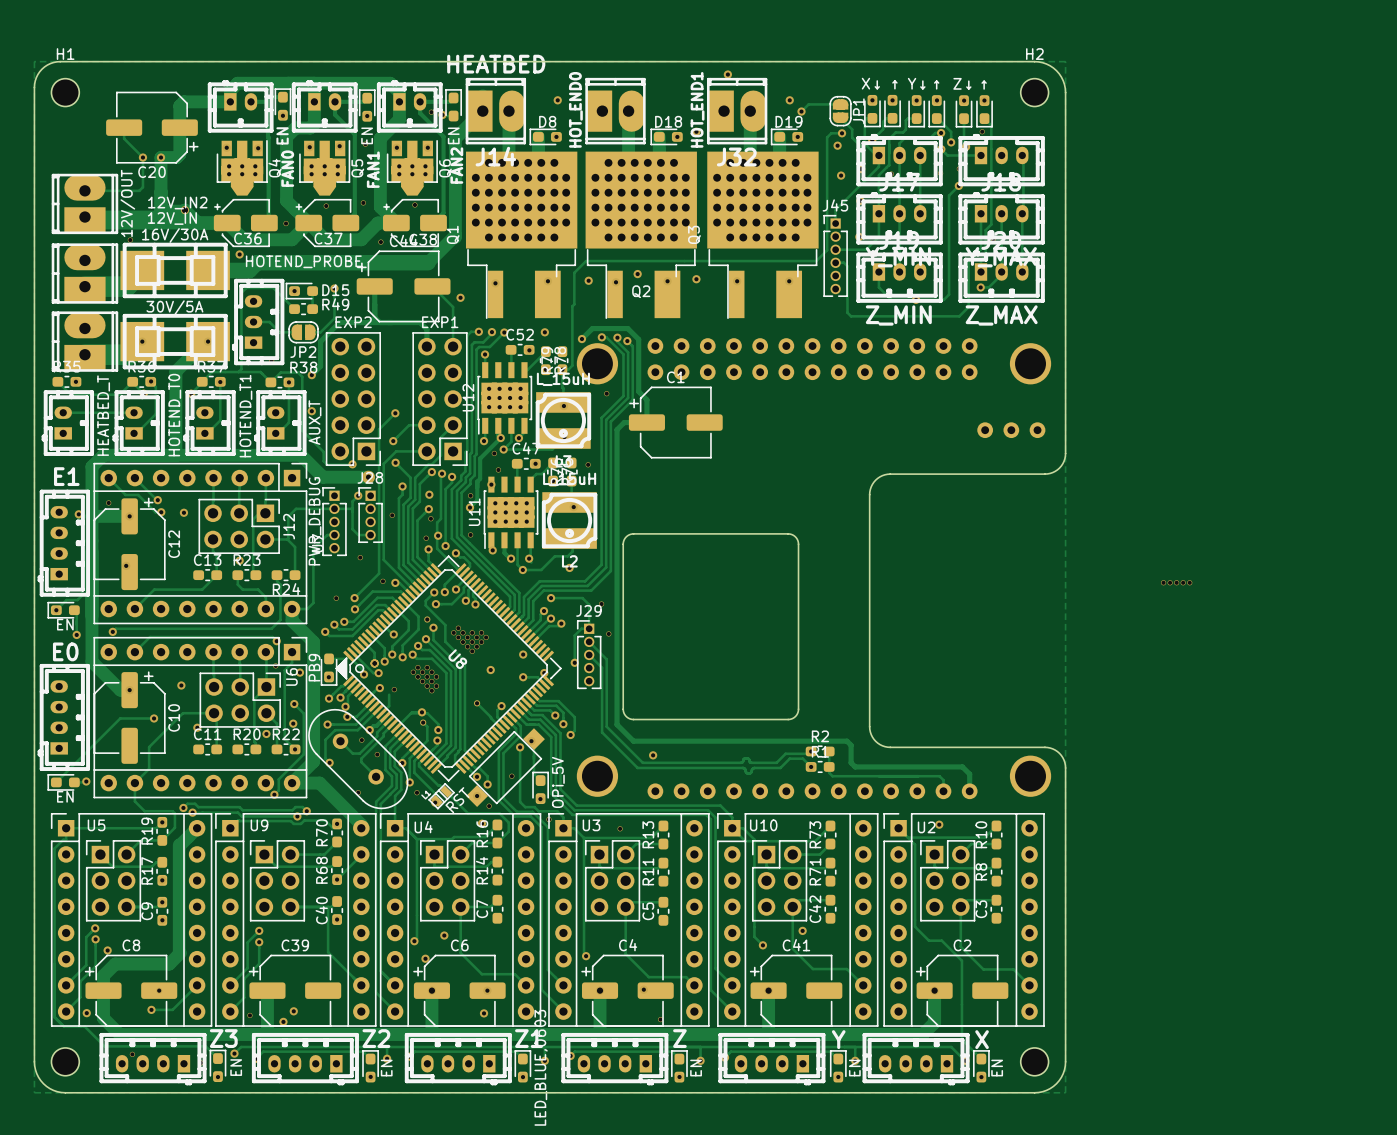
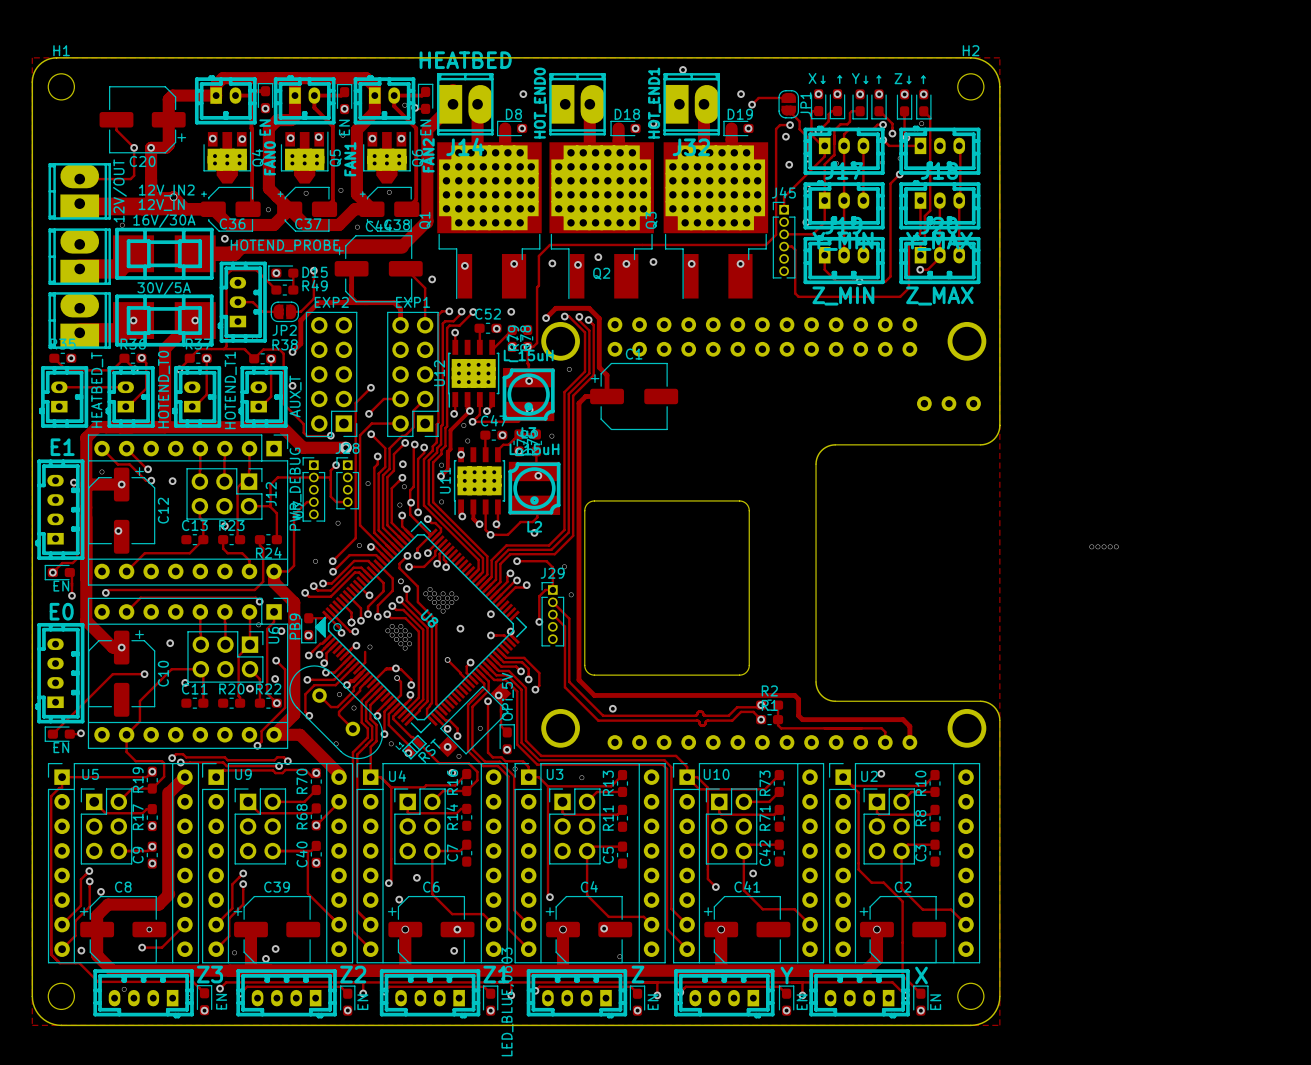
part value position: OPi_5V (558, 782) -> OPi_5V (507, 696)

